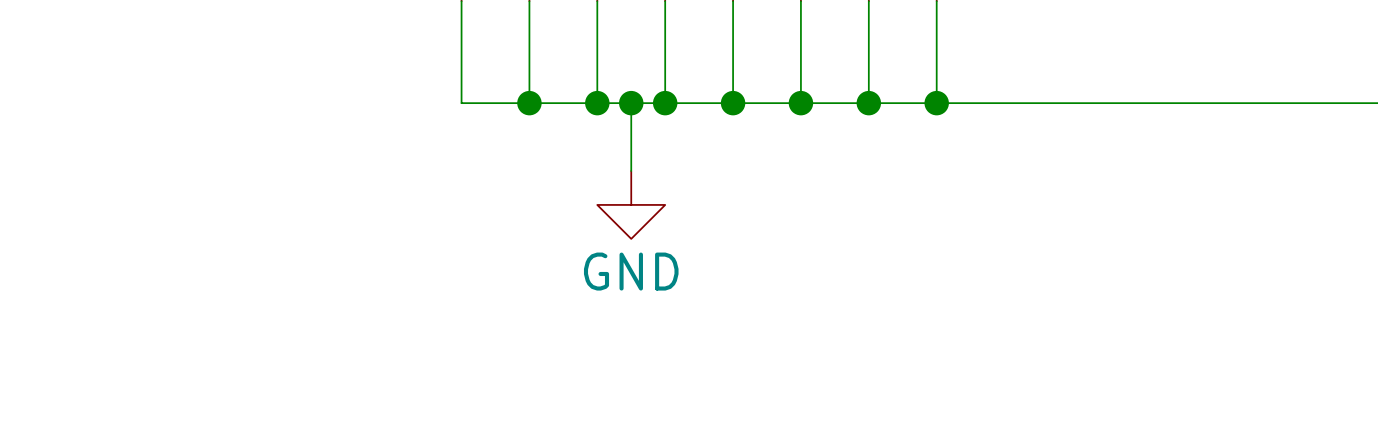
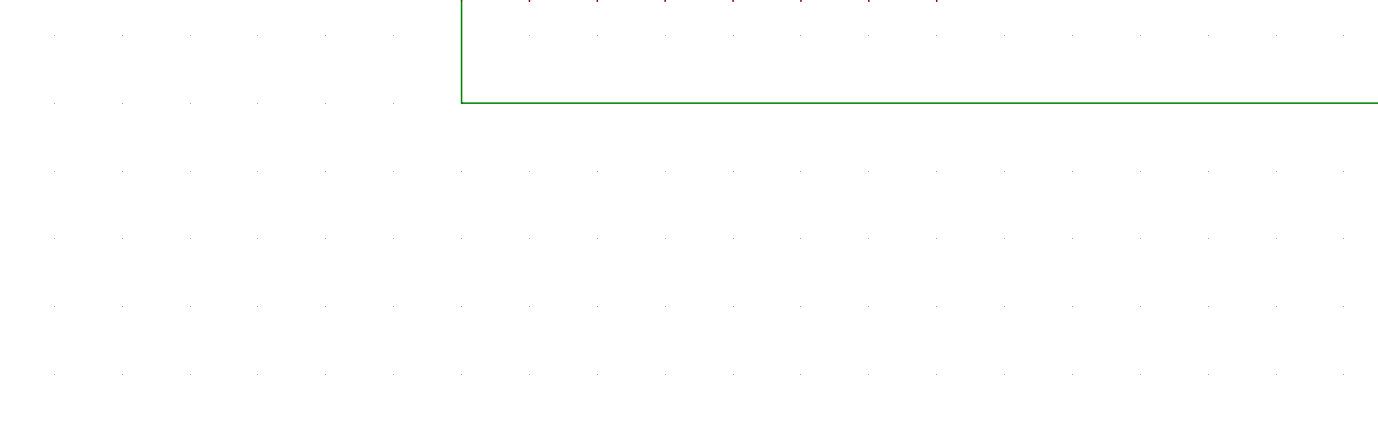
wire: (529, 1) (529, 103) -> none
wire: (597, 1) (597, 103) -> none
wire: (665, 1) (665, 103) -> none
wire: (733, 1) (733, 103) -> none
wire: (800, 1) (800, 103) -> none
wire: (868, 1) (868, 103) -> none
wire: (936, 1) (936, 103) -> none
junction: (529, 103) -> none
junction: (597, 103) -> none
wire: (631, 103) (631, 171) -> none
junction: (631, 103) -> none
junction: (665, 103) -> none
junction: (733, 103) -> none
junction: (800, 103) -> none
junction: (868, 103) -> none
junction: (936, 103) -> none
power symbol: GND (631, 204) -> none

